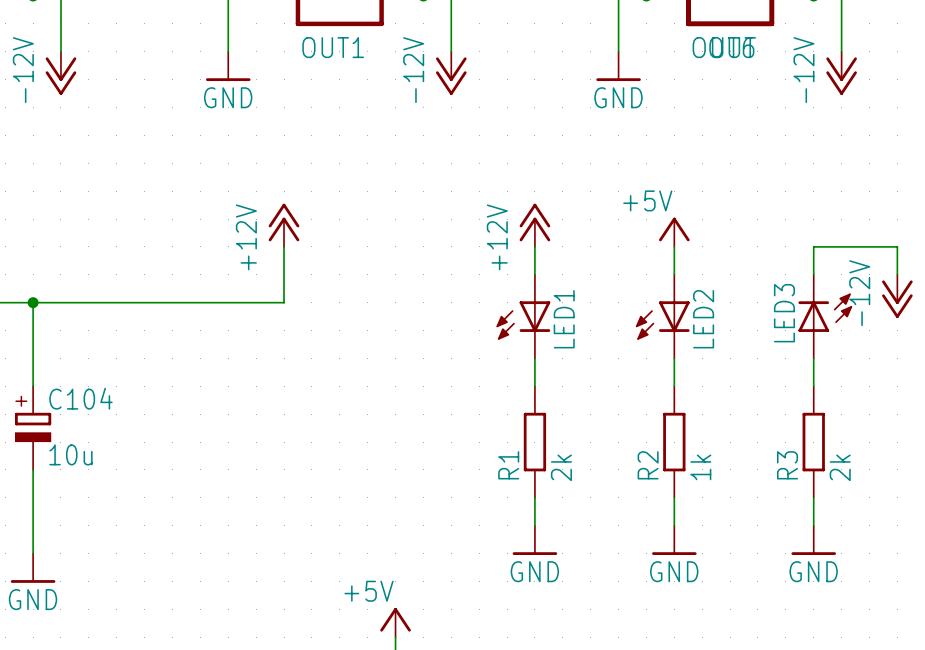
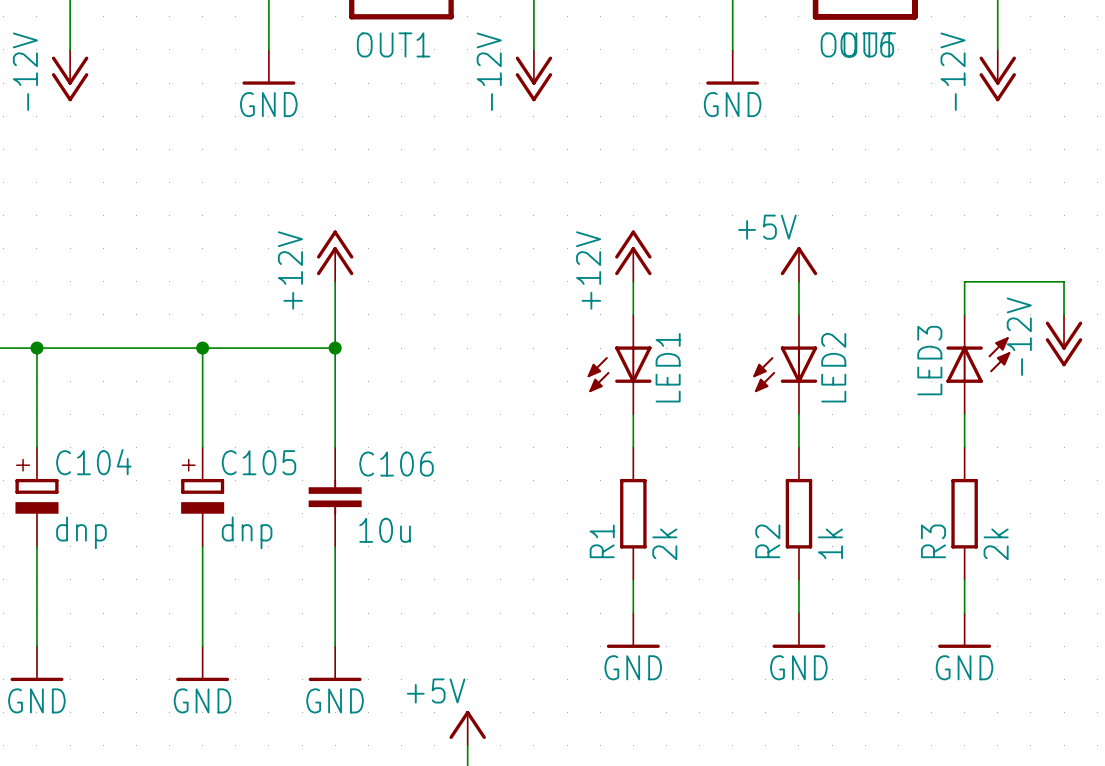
wire: none -> (202, 348) (202, 447)
junction: none -> (202, 348)
wire: none -> (335, 348) (335, 447)
junction: none -> (335, 348)
C105: none -> dnp (202, 497)
C106: none -> 10u (335, 497)
C104 value: 10u (70, 454) -> dnp (81, 532)
wire: none -> (202, 546) (202, 646)
wire: none -> (335, 546) (335, 646)
power symbol: none -> GND (202, 663)
power symbol: none -> GND (335, 663)

